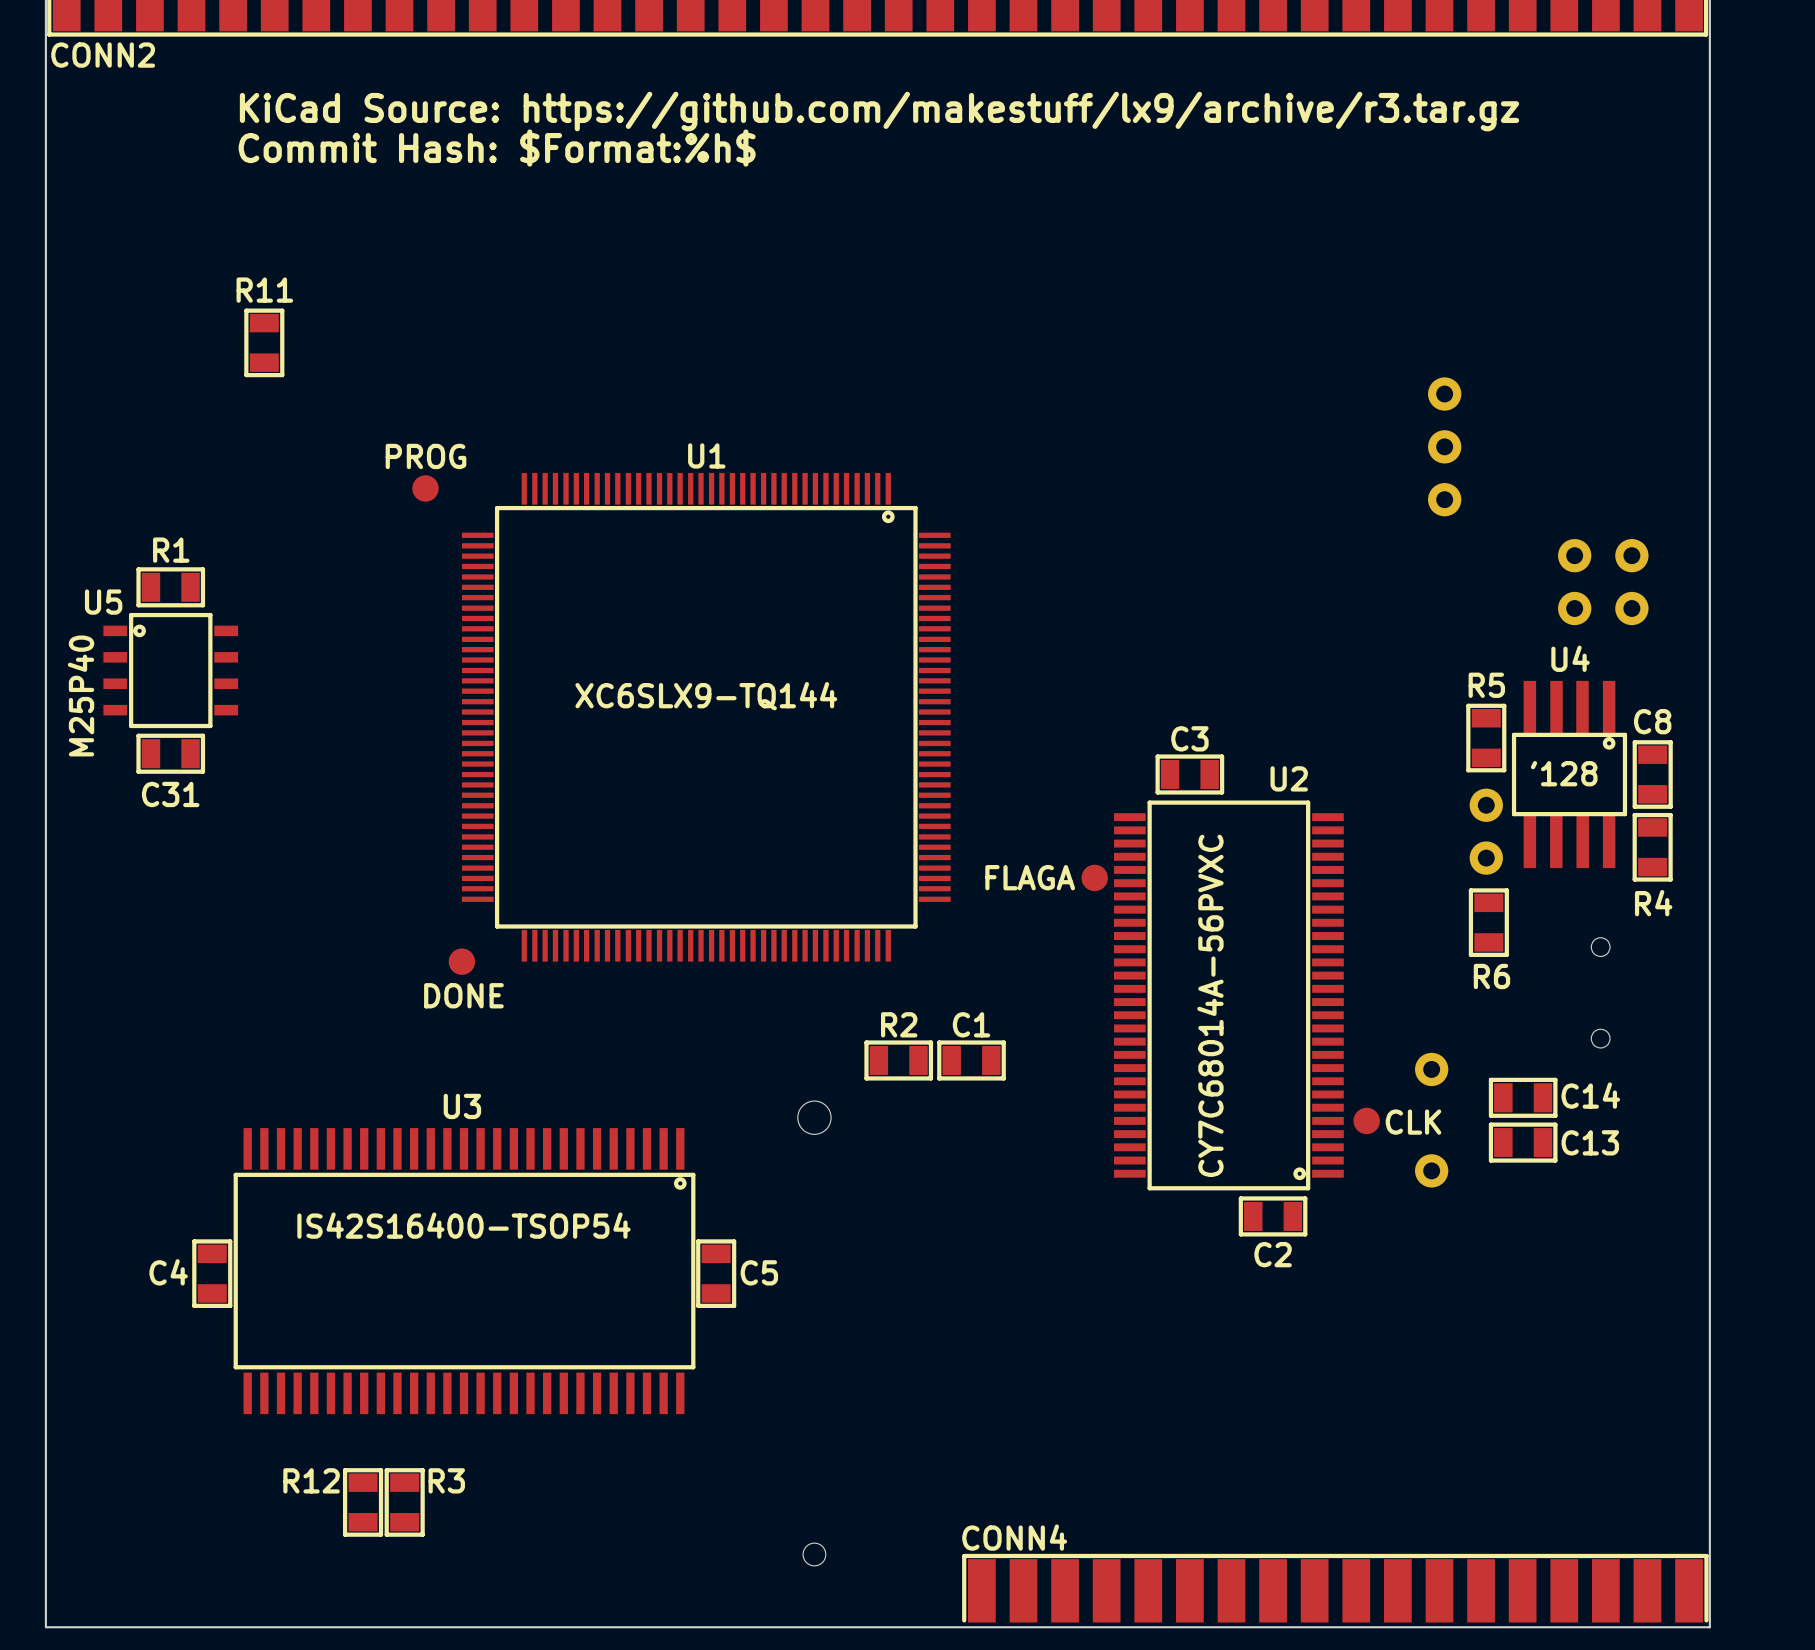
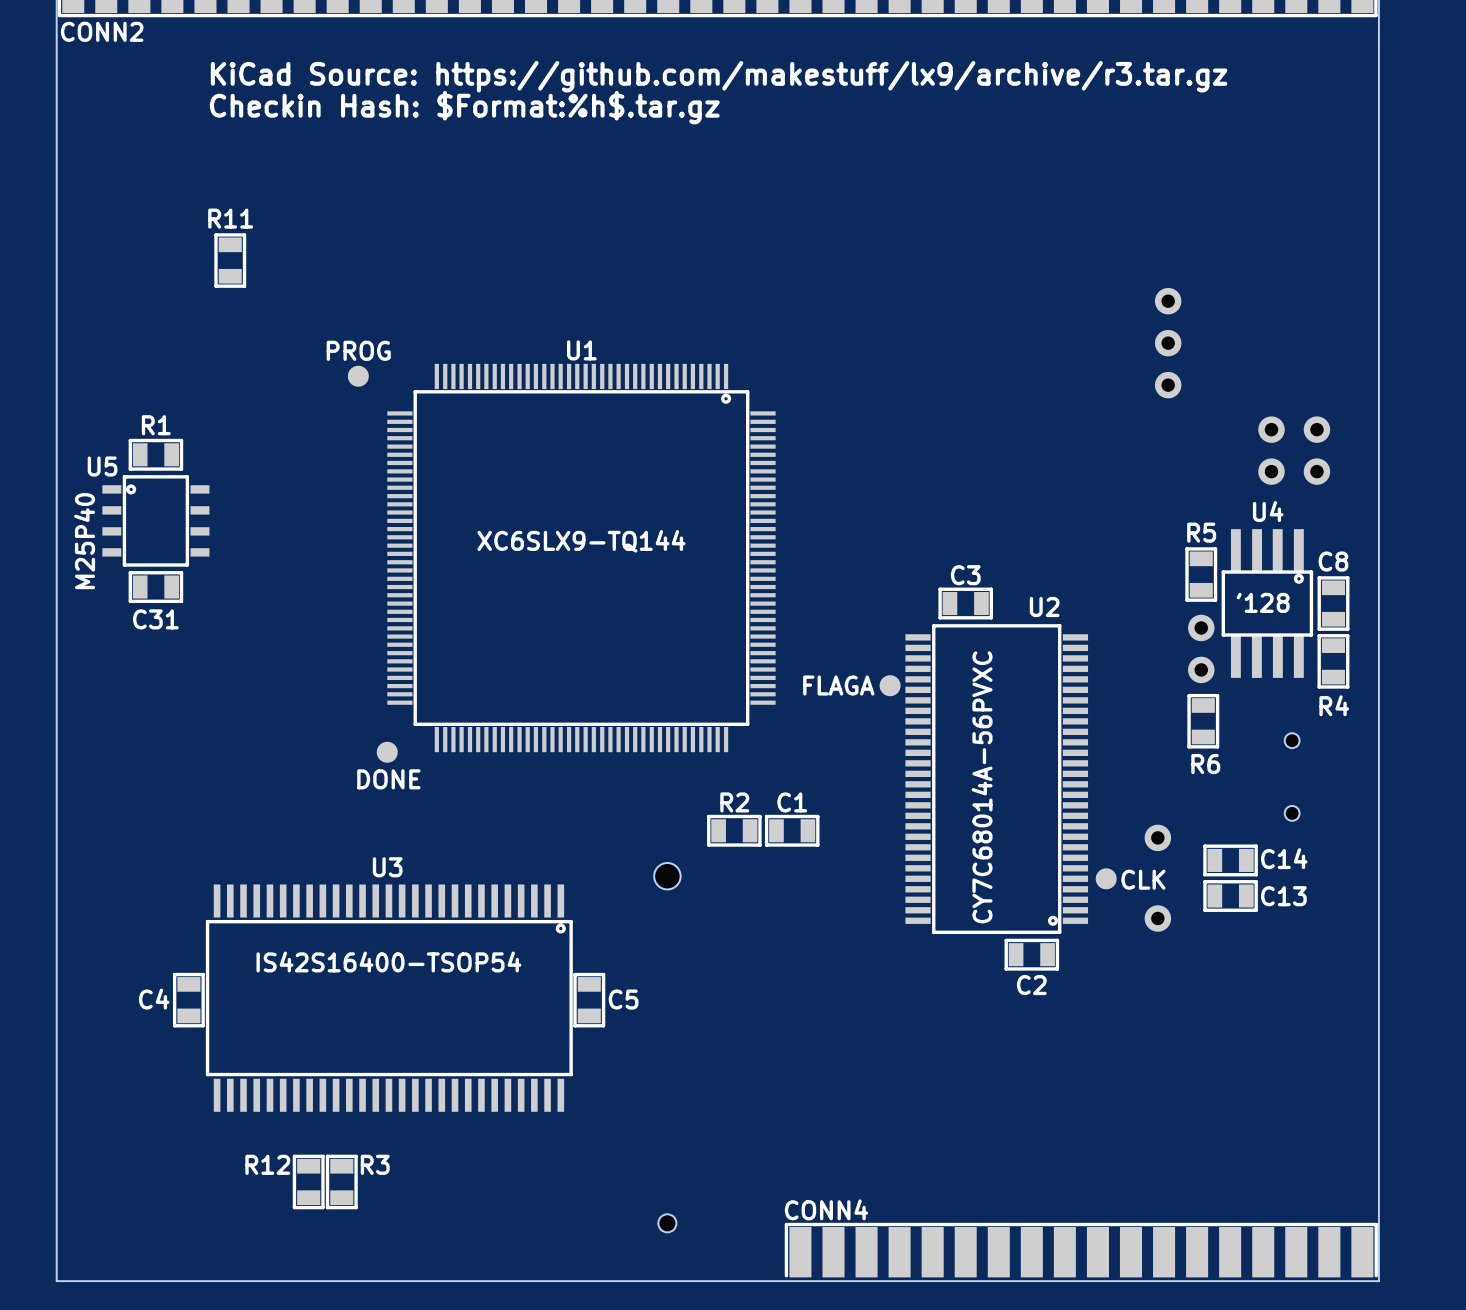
text: Commit Hash: $Format:%h$ (497, 148) -> Checkin Hash: $Format:%h$.tar.gz (464, 107)

